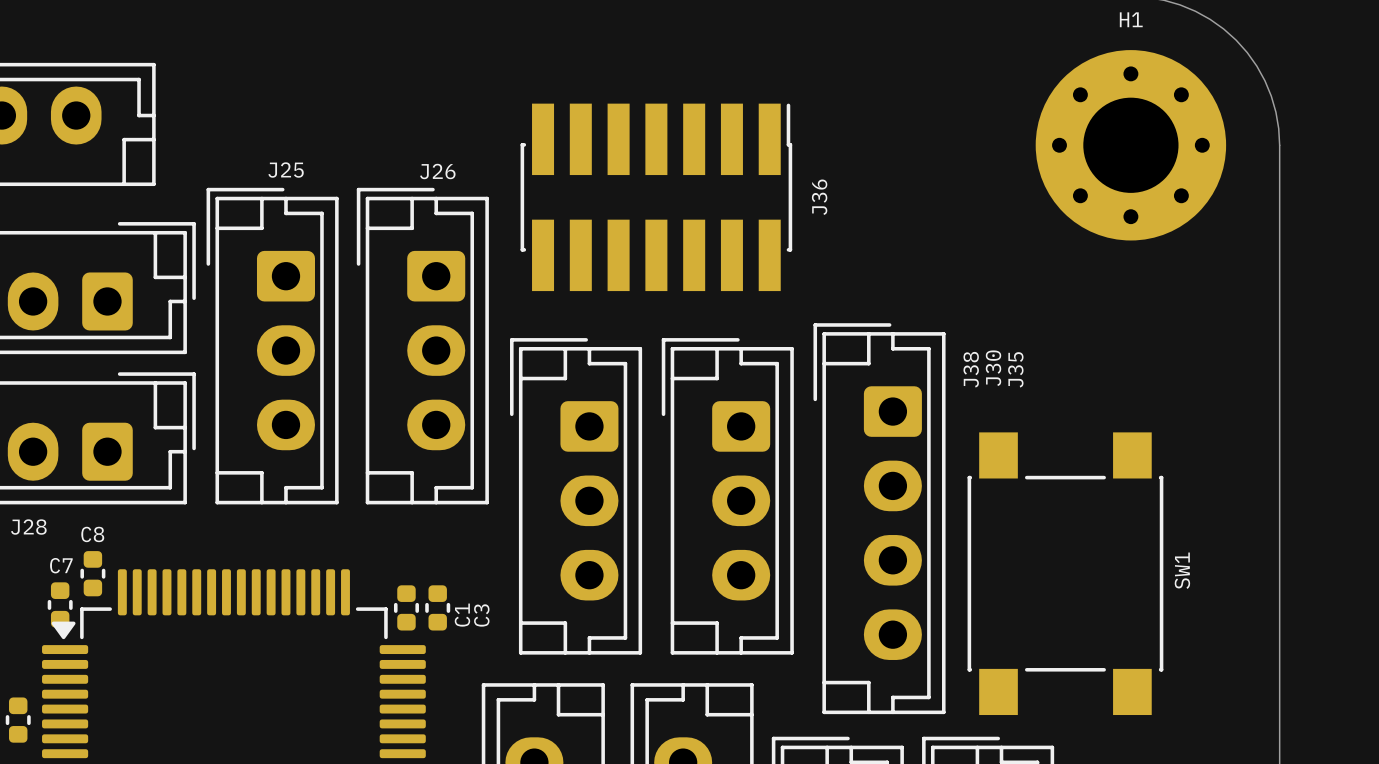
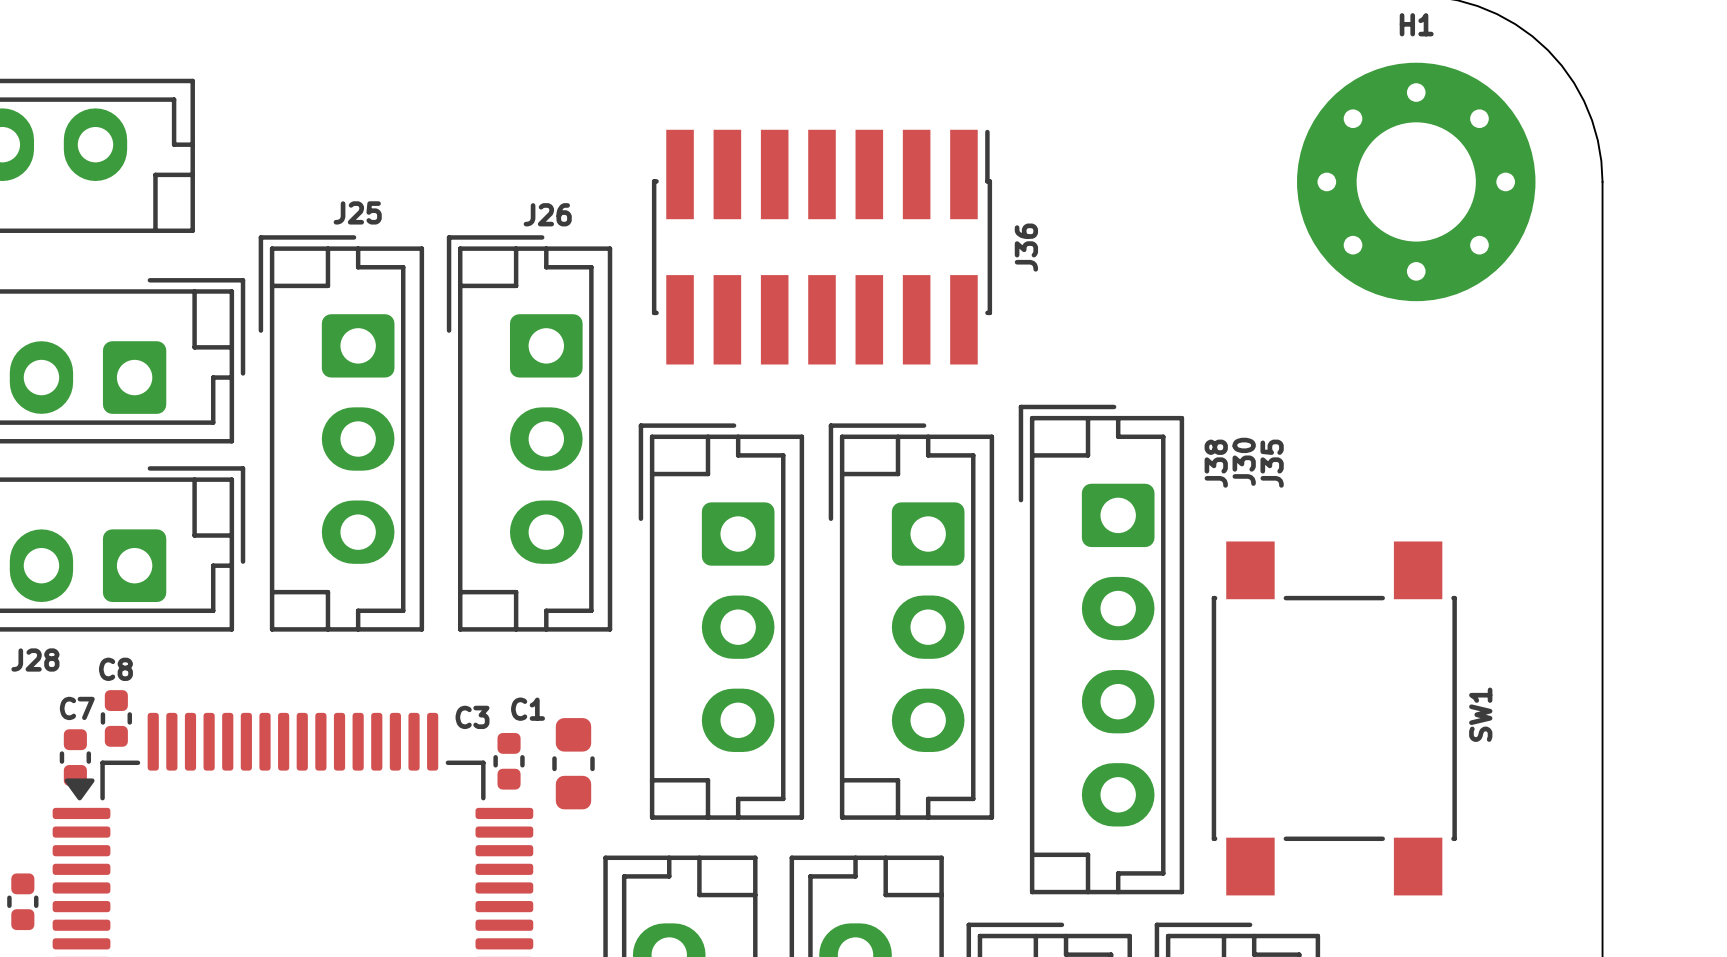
C3: (437, 607) -> none
C1: none -> (573, 763)
C1 name: C1 (462, 615) -> C3 (472, 717)

